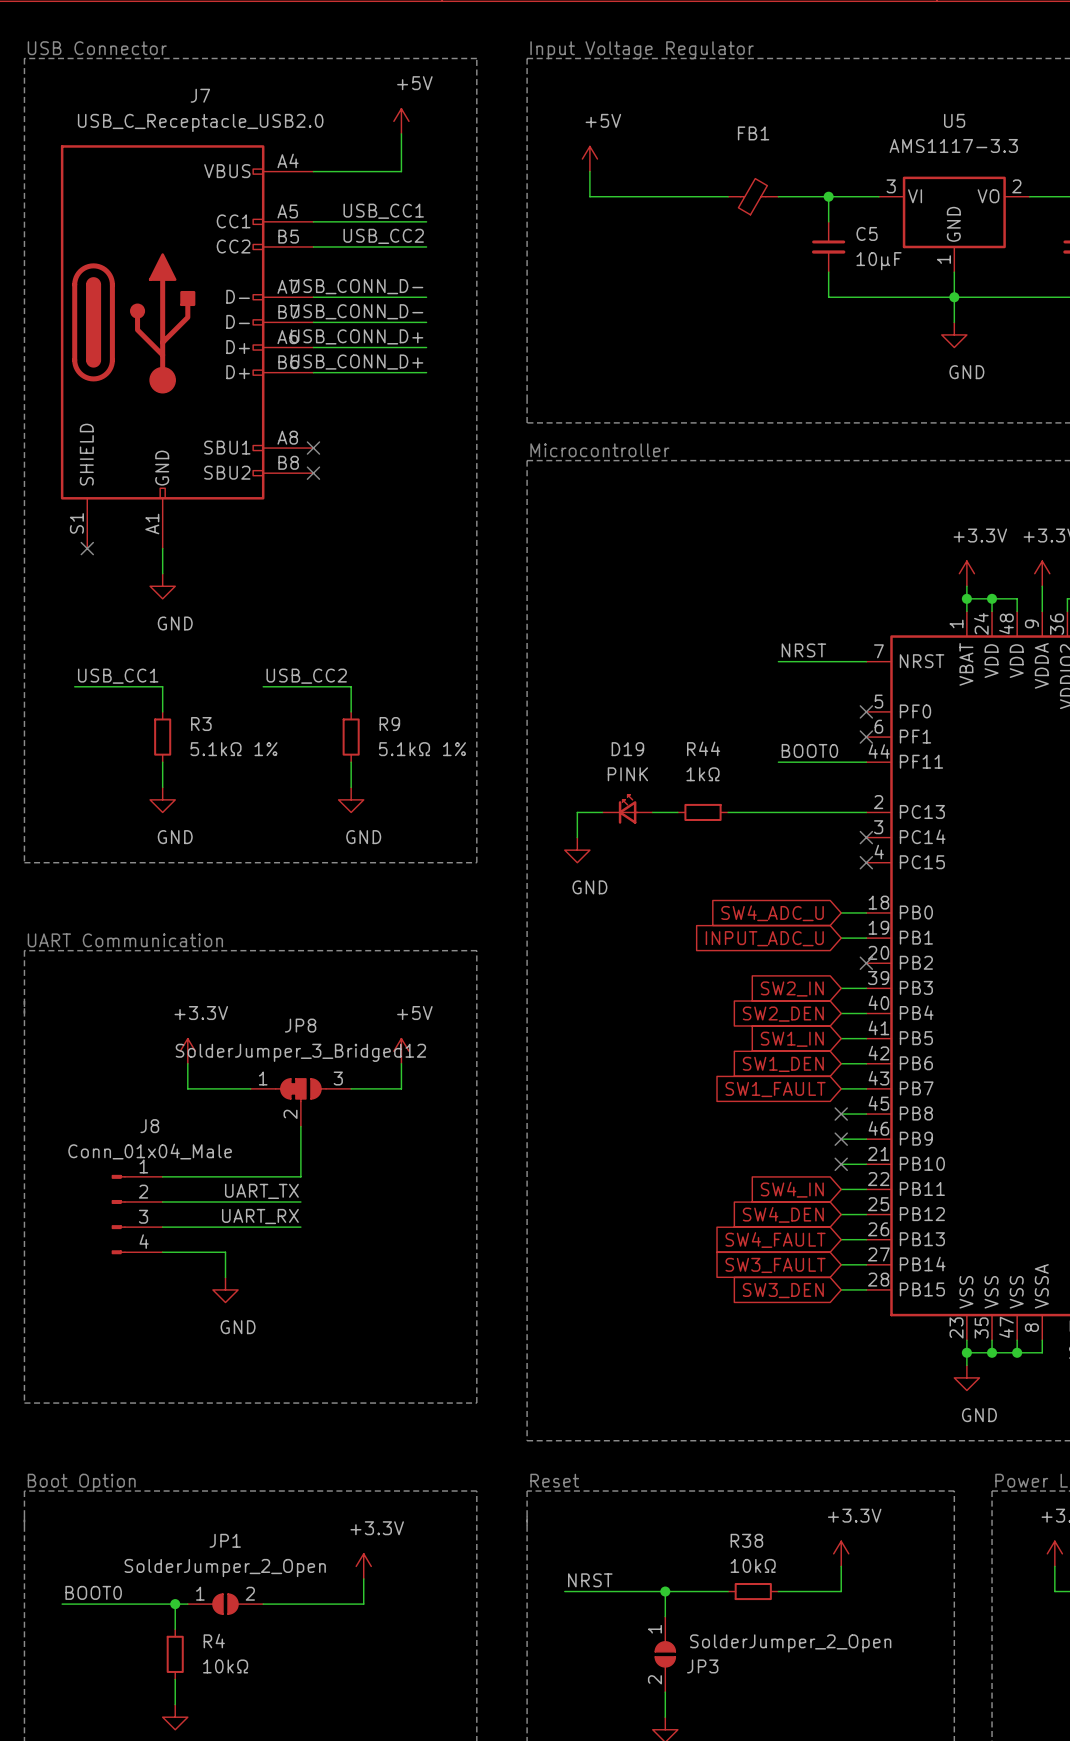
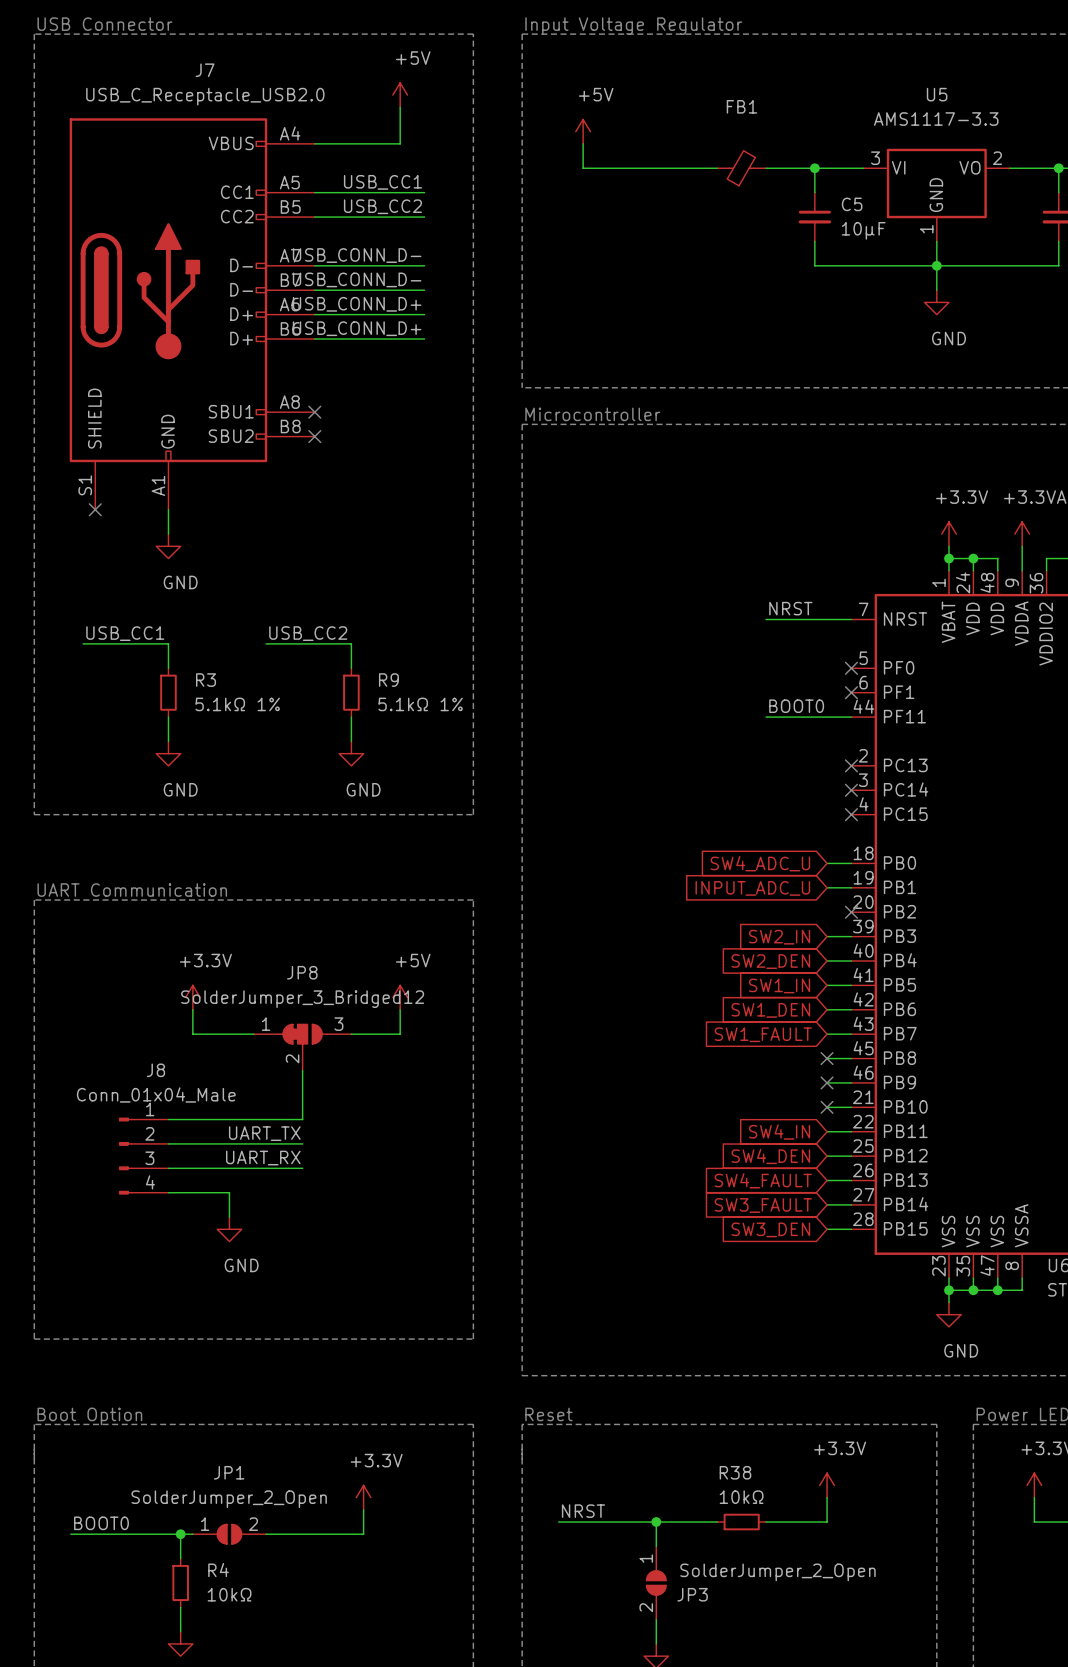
D19: PINK (627, 809) -> none
wire: (602, 812) (577, 812) (577, 837) -> none
wire: (652, 812) (677, 812) -> none
R44: 1kΩ (703, 812) -> none
wire: (728, 812) (866, 812) -> none
no-connect mark: none -> (851, 765)
power symbol: GND (577, 850) -> none

